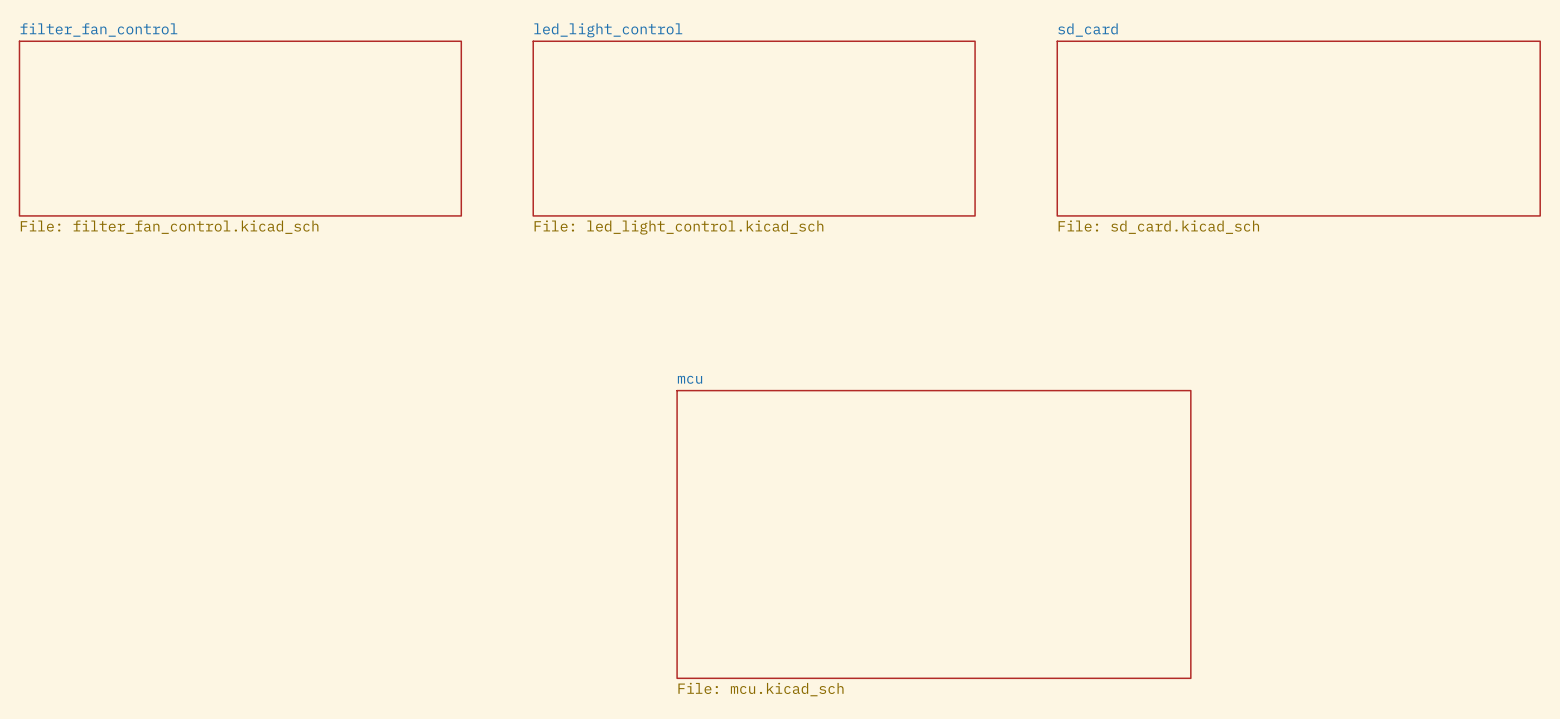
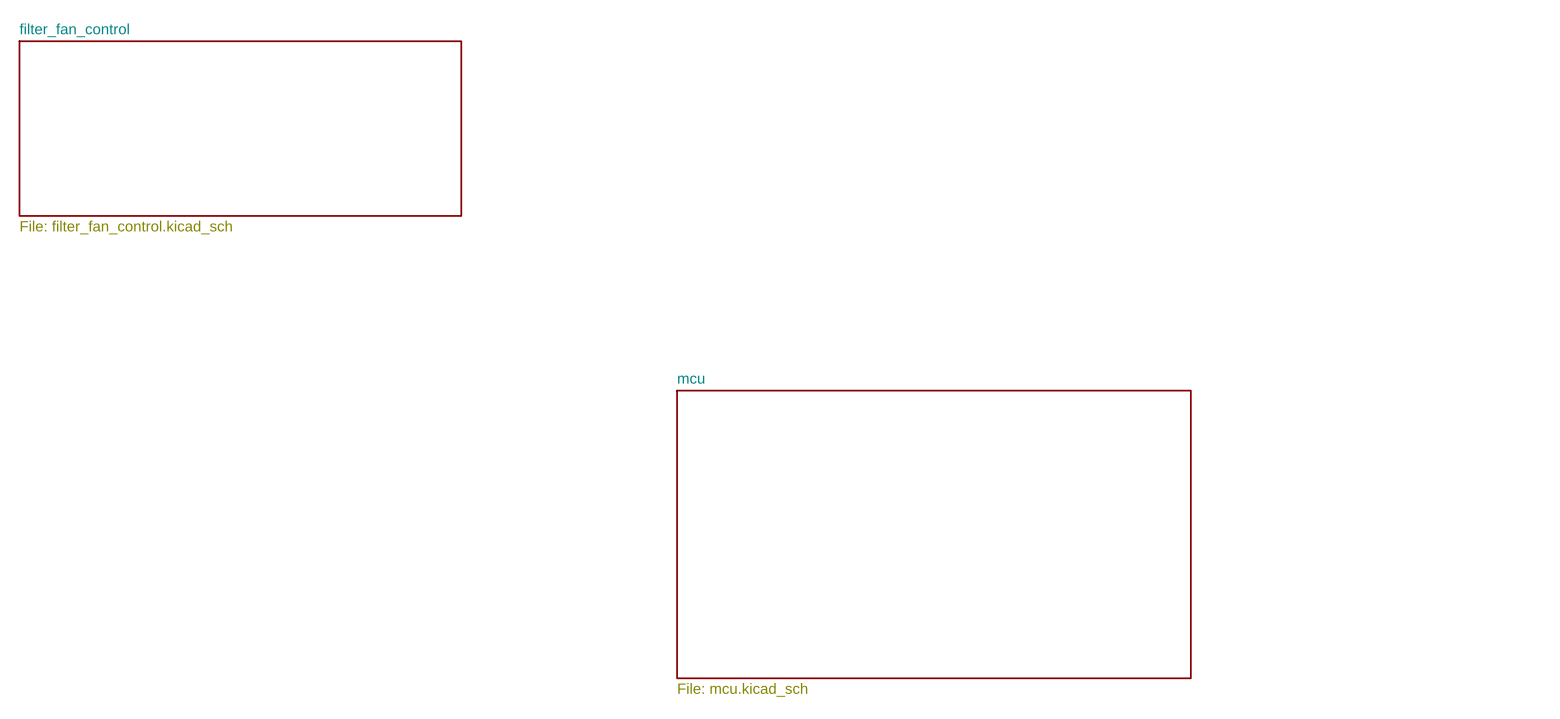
sheet led_light_control: File: led_light_control.kicad_sch (754, 128) -> none
sheet sd_card: File: sd_card.kicad_sch (1298, 128) -> none

